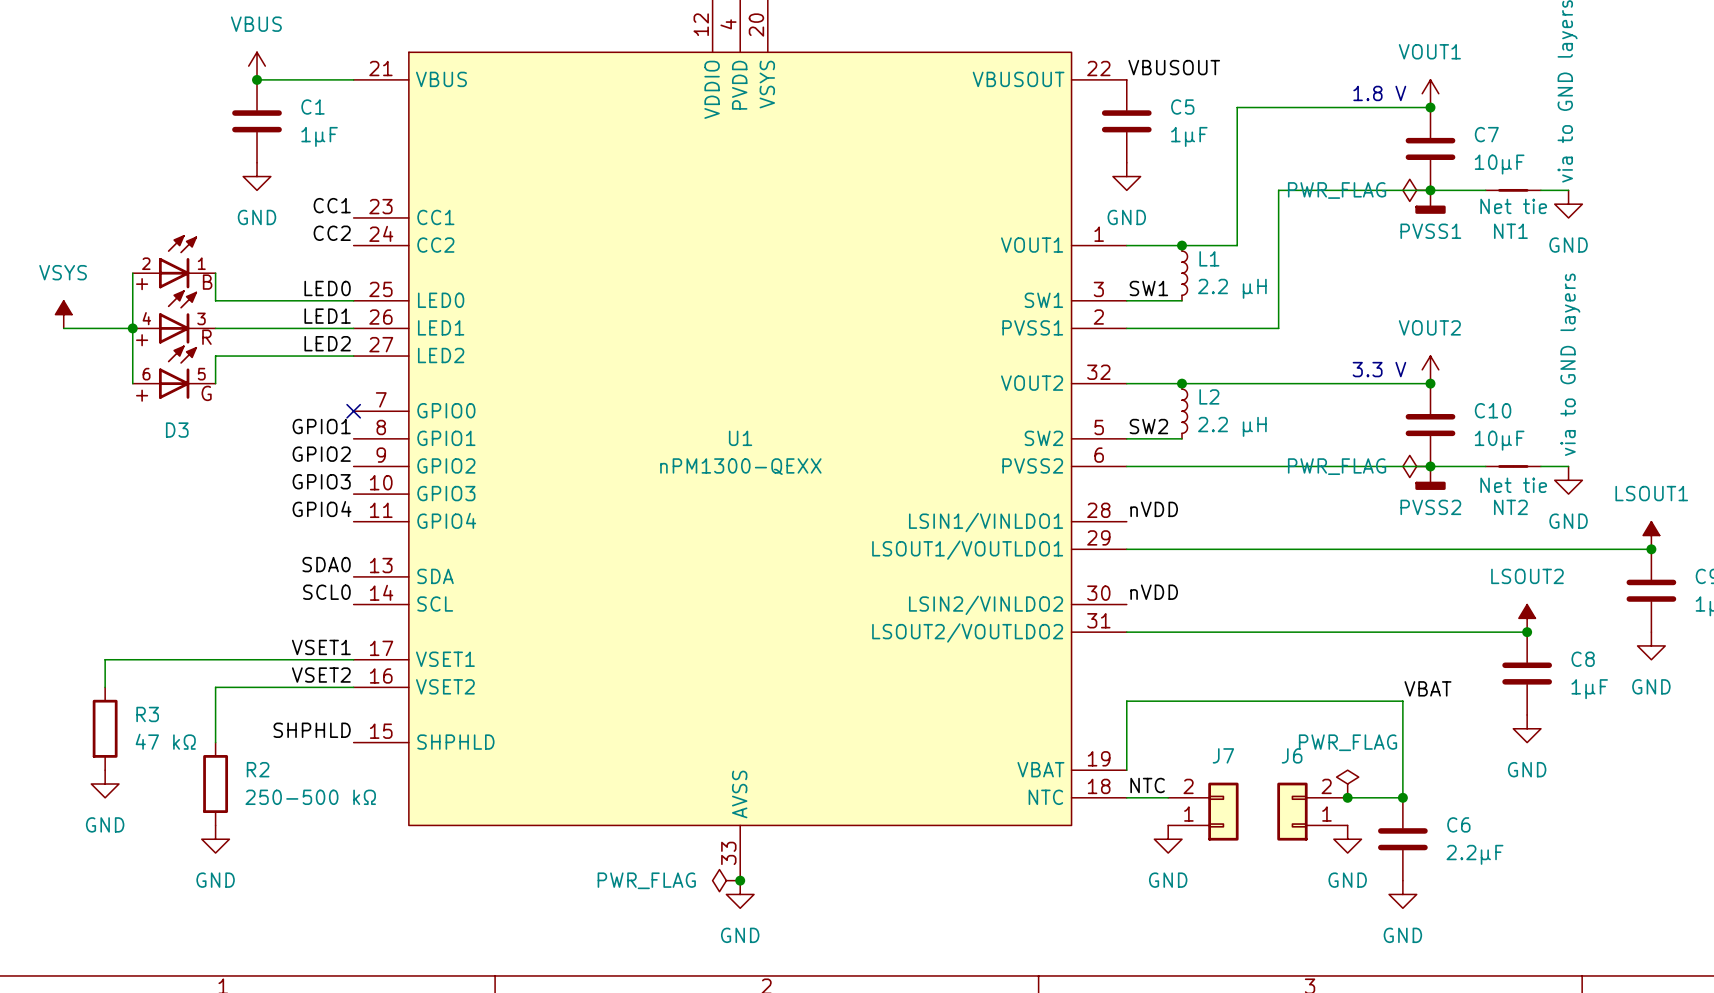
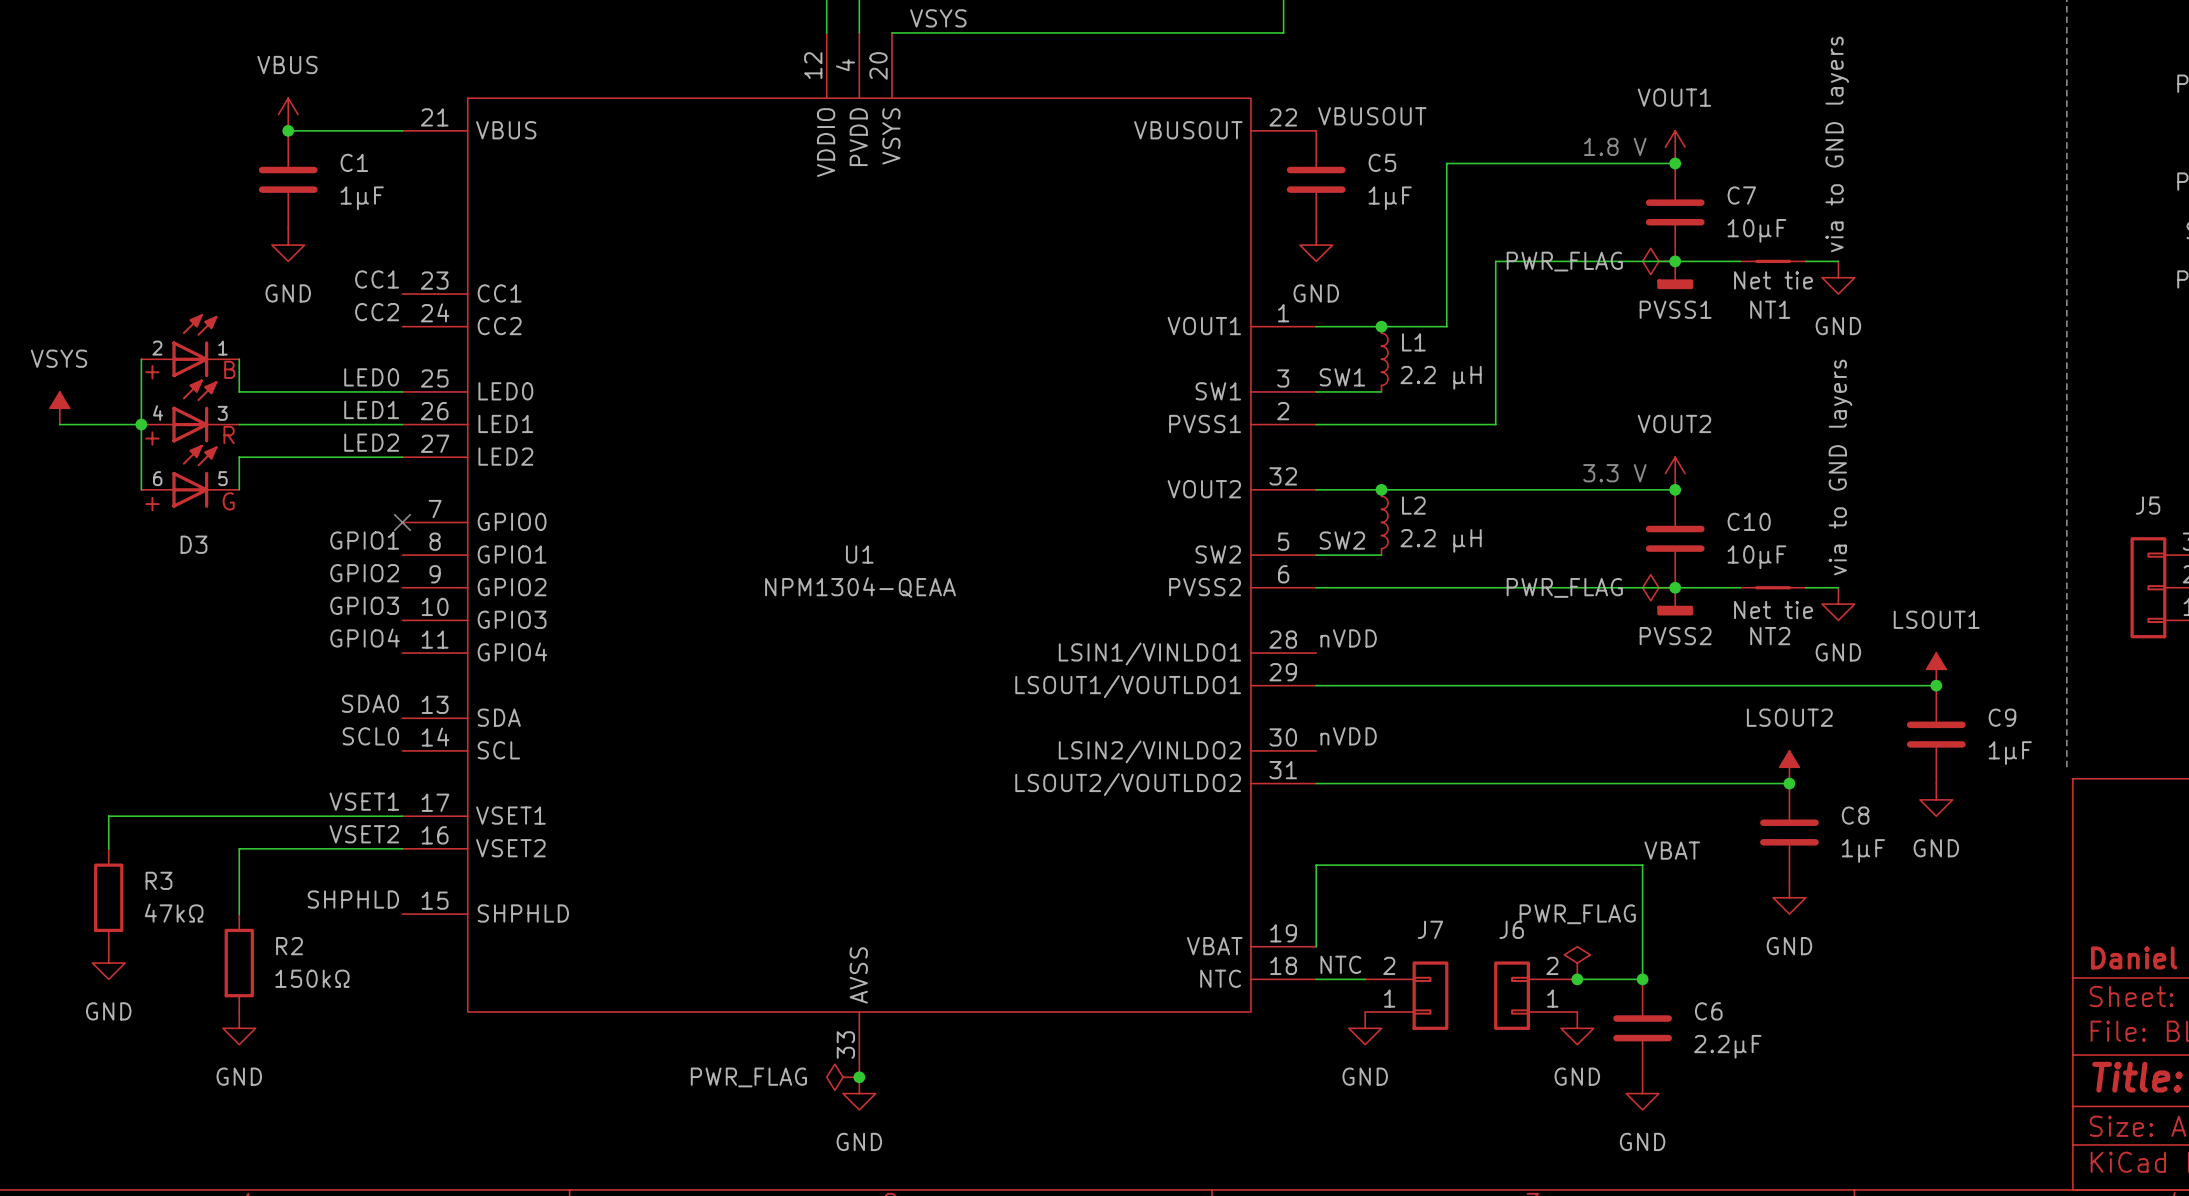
U1 value: nPM1300-QEXX (740, 466) -> NPM1304-QEAA (860, 587)
R3 value: 47 kΩ (165, 741) -> 47kΩ (174, 913)
R2 value: 250-500 kΩ (310, 797) -> 150kΩ (312, 978)

